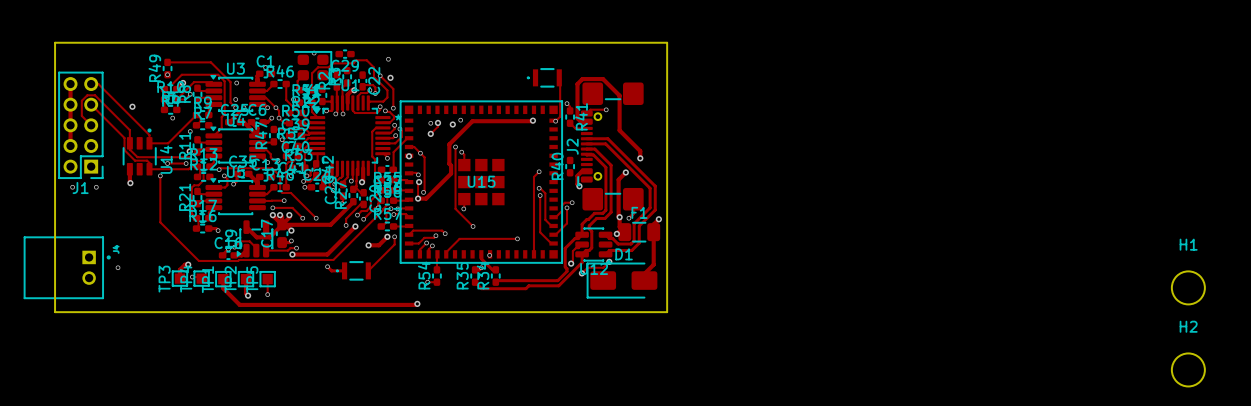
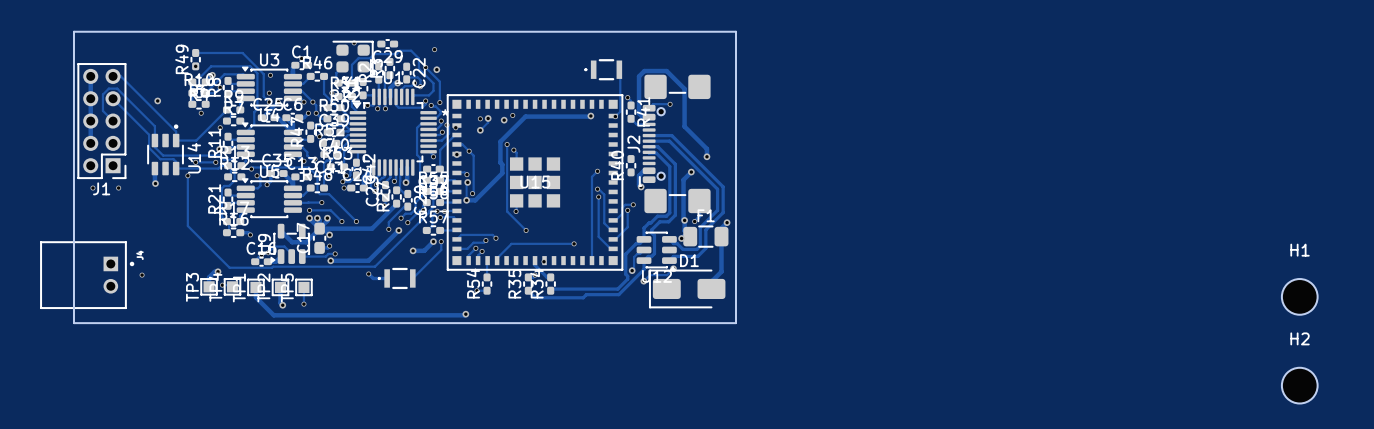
via: none -> (455, 127)

